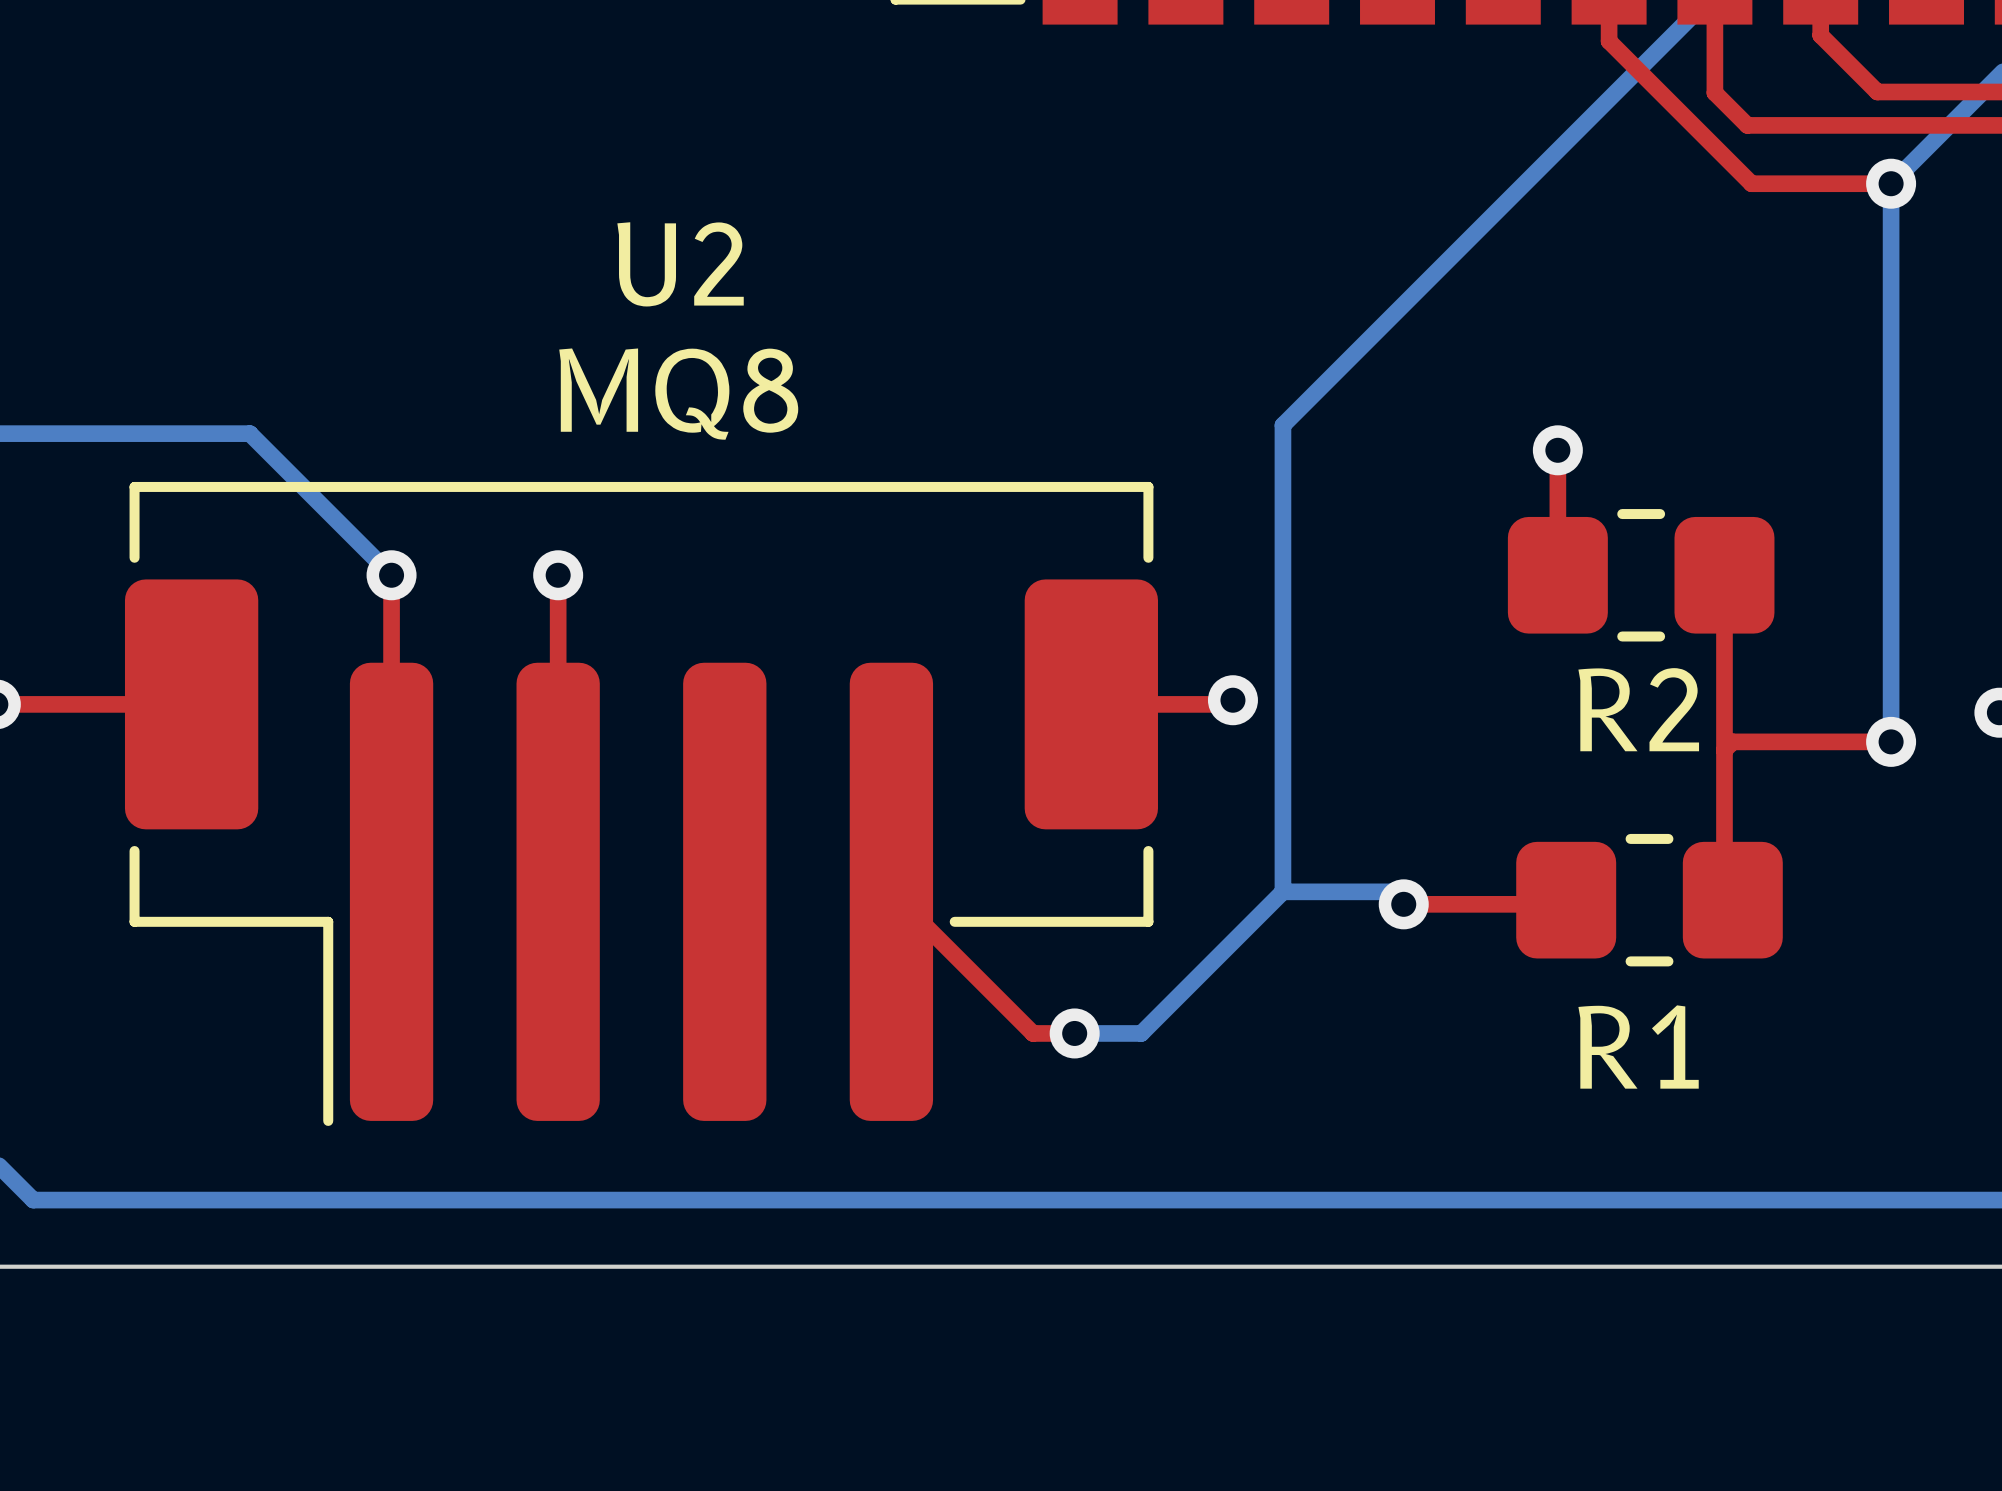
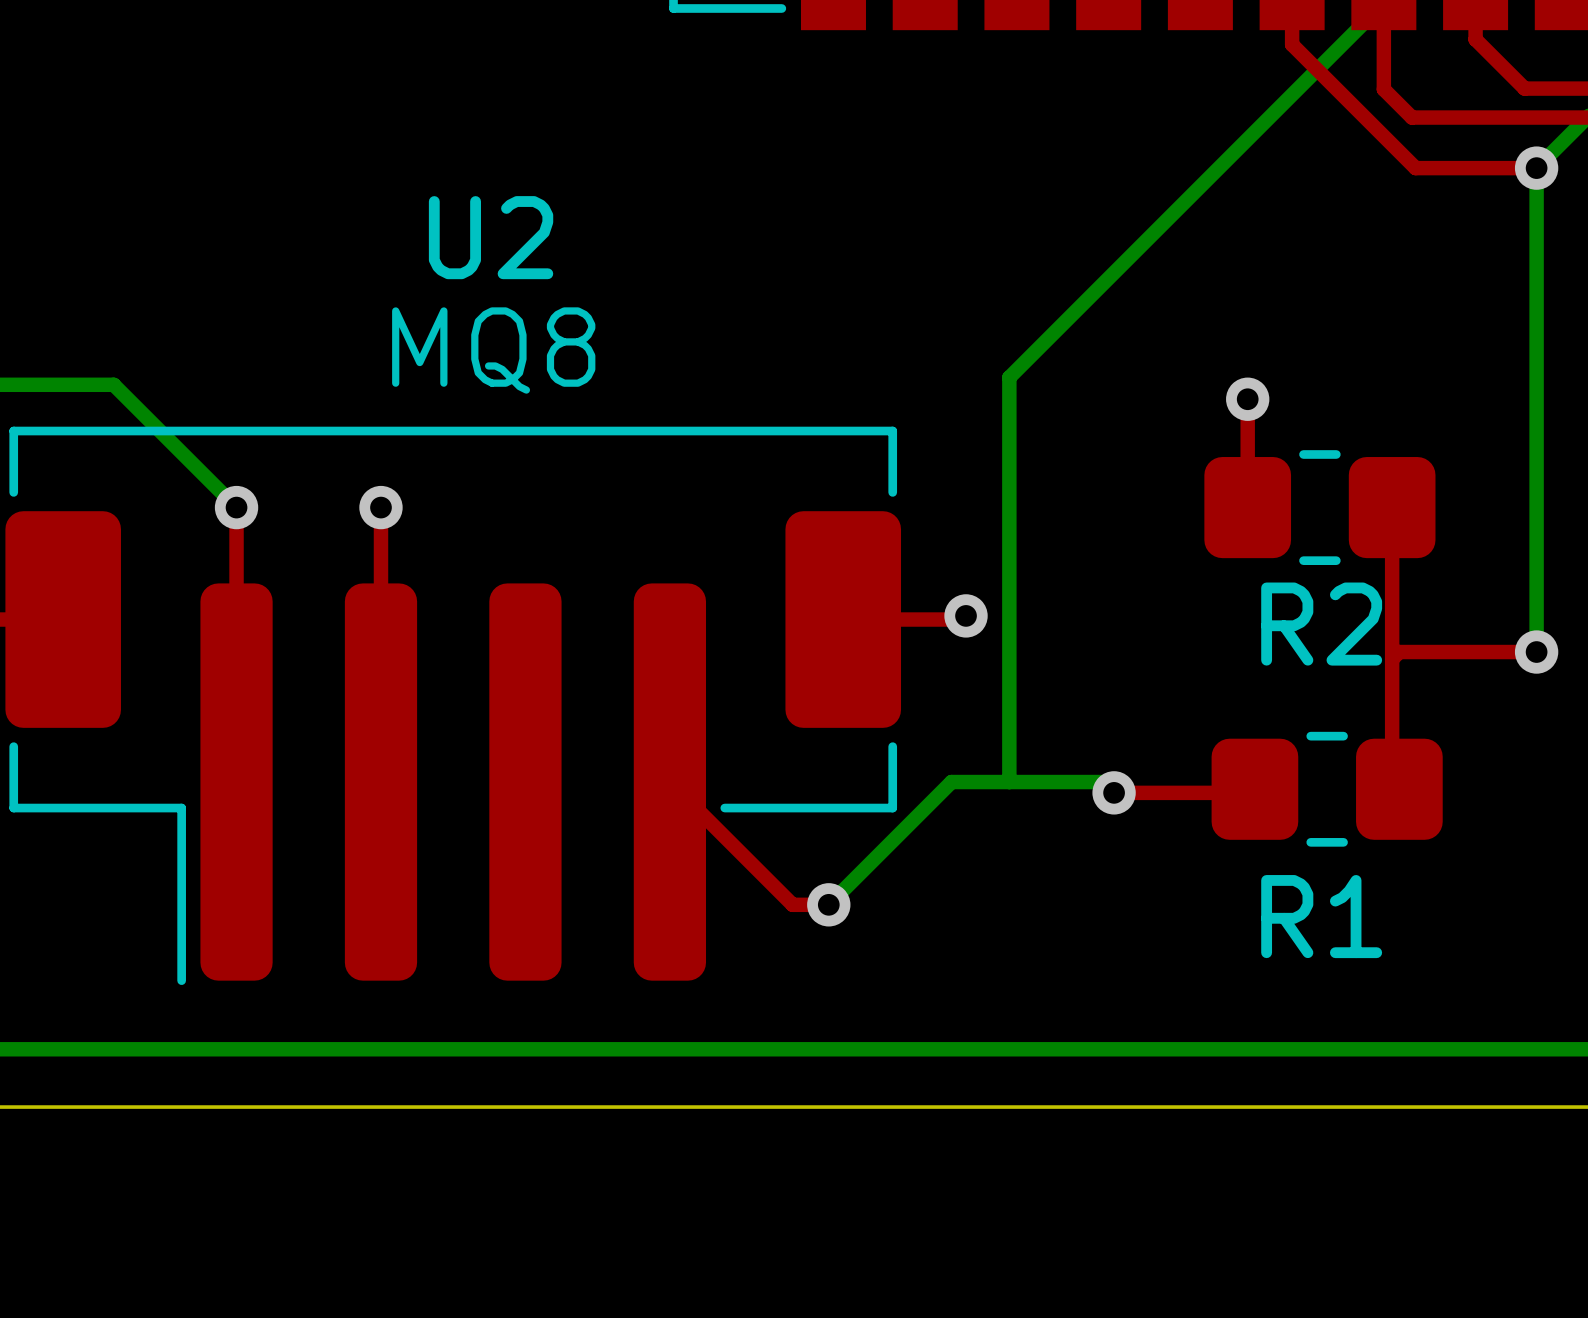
bottom track: (1282, 891) (1141, 1033) (1074, 1033) -> (1009, 782) (951, 782) (828, 904)

